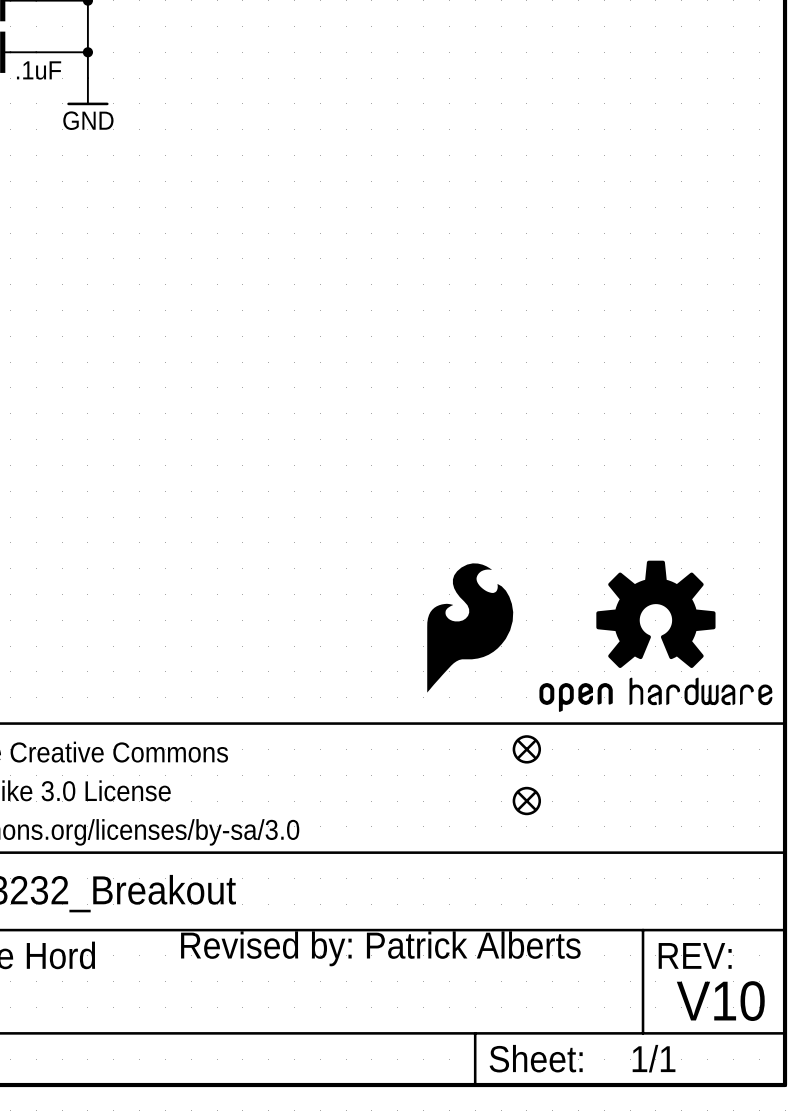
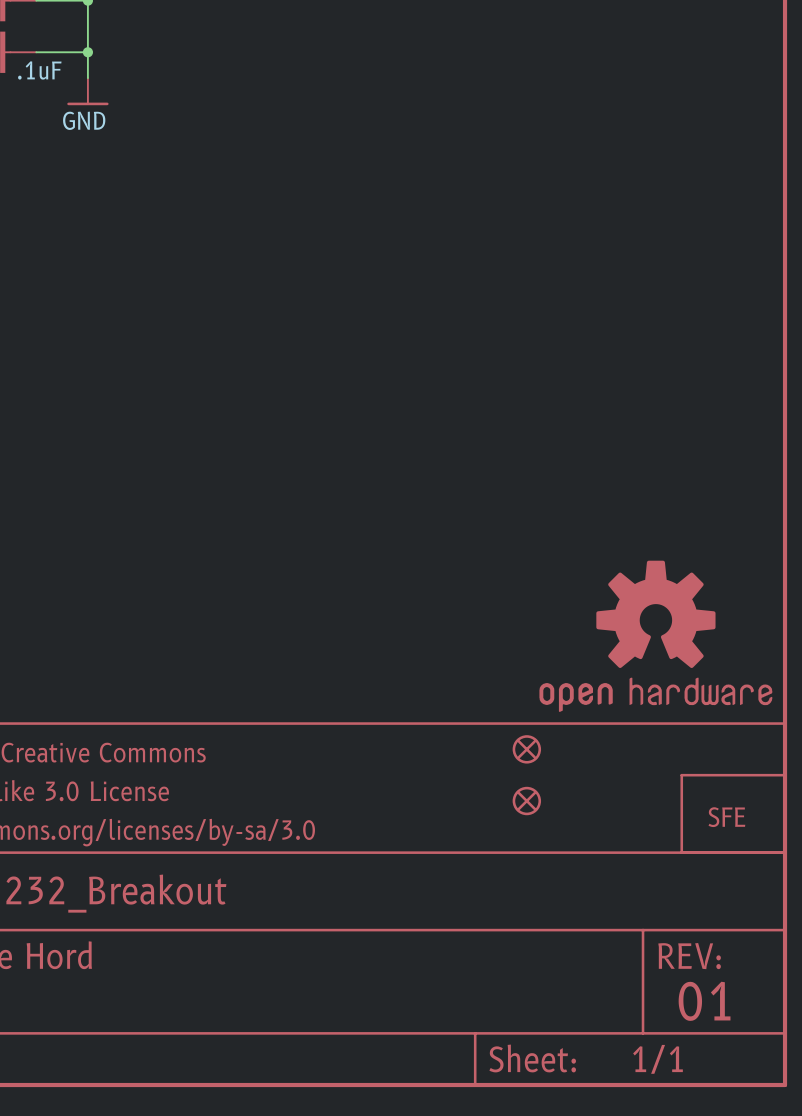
part: (470, 627) -> none
part: none -> (733, 813)
text: Revised by: Patrick Alberts (380, 948) -> none
text: V10 (720, 1001) -> 01 (704, 1001)

